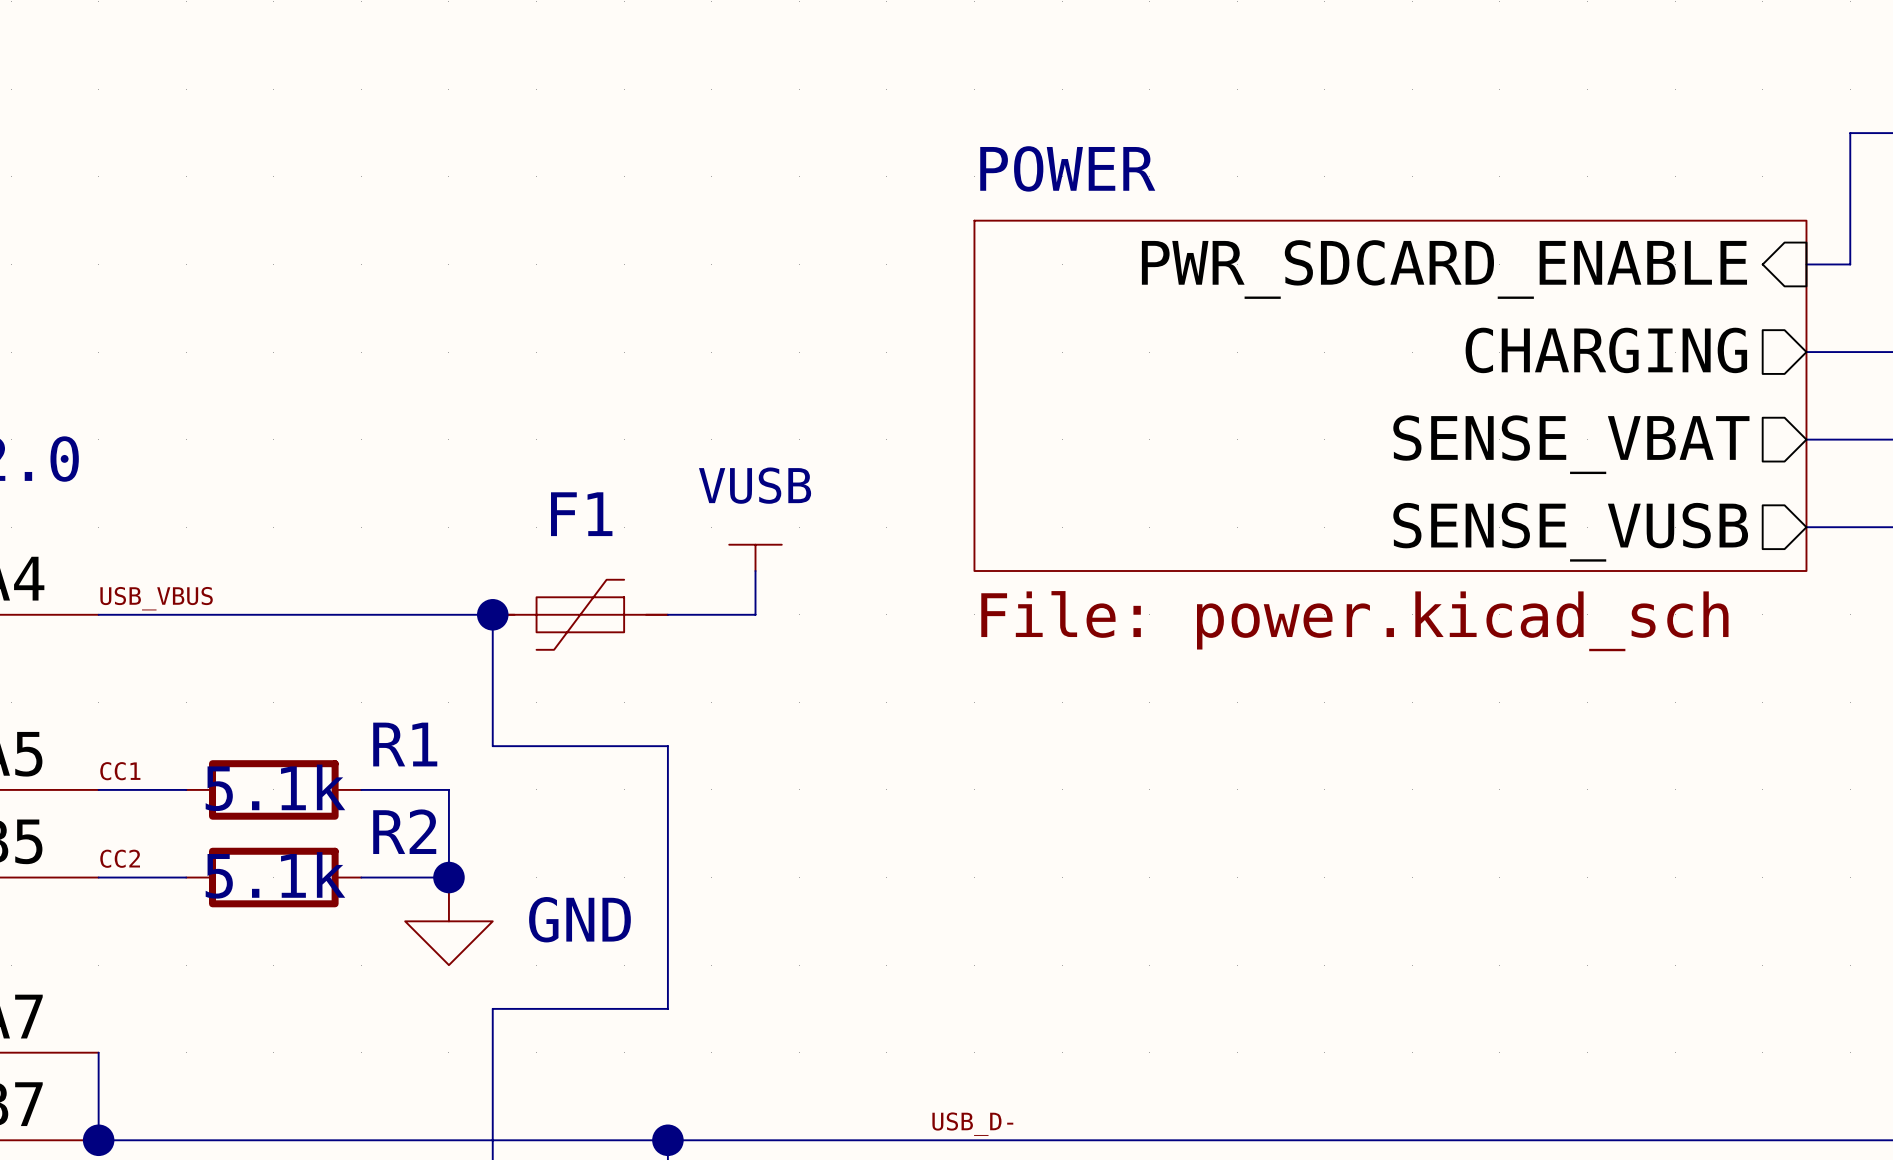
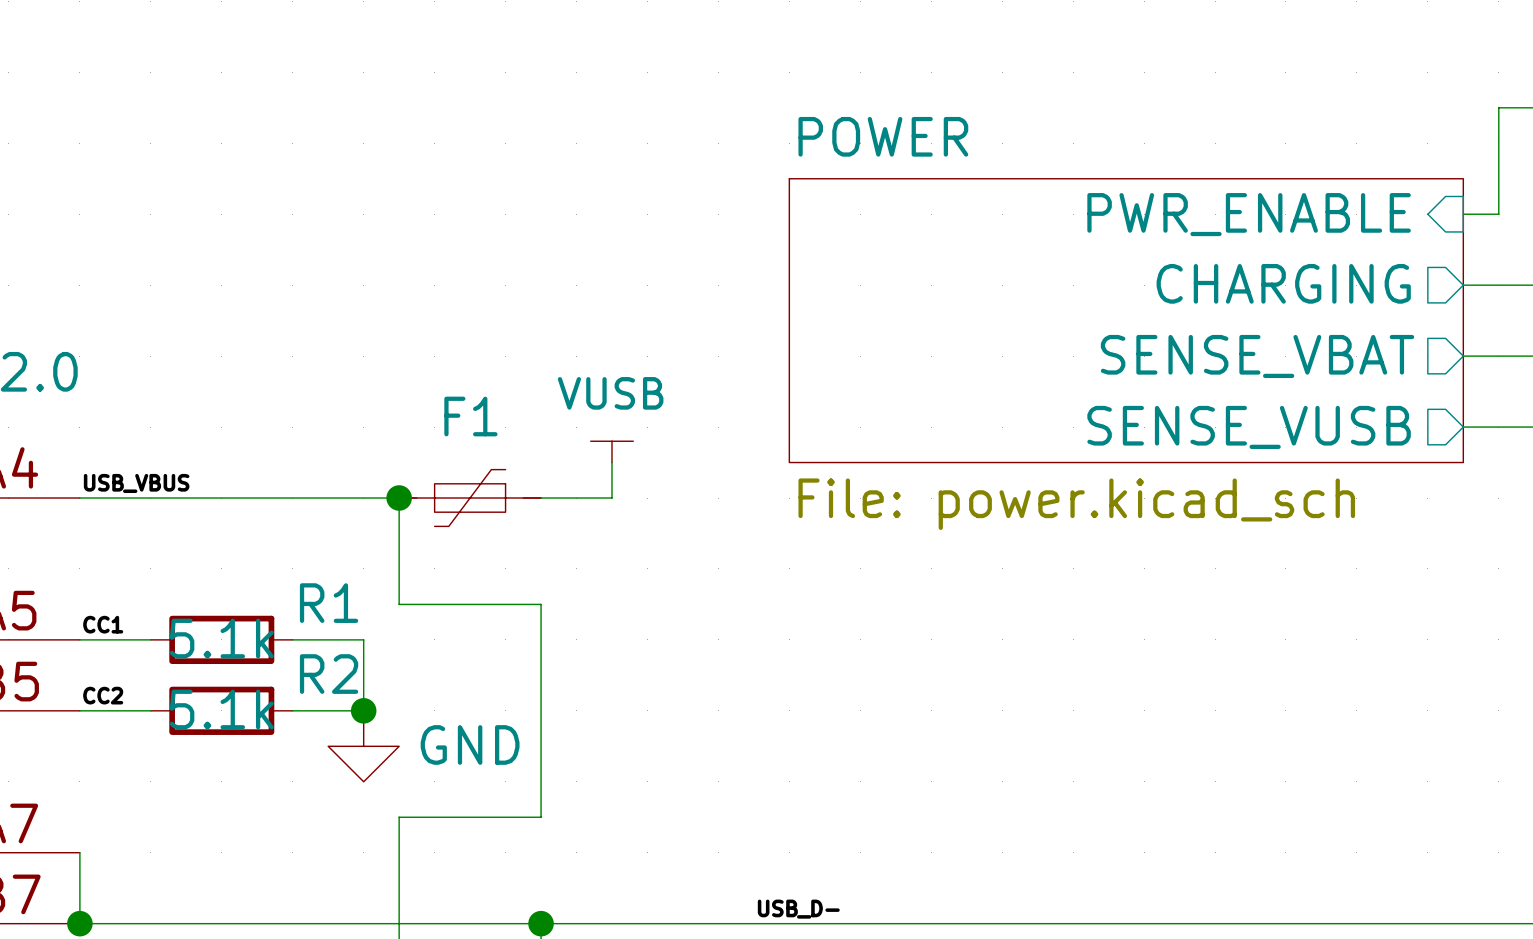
sheet pin: PWR_SDCARD_ENABLE (1444, 269) -> PWR_ENABLE (1249, 214)

